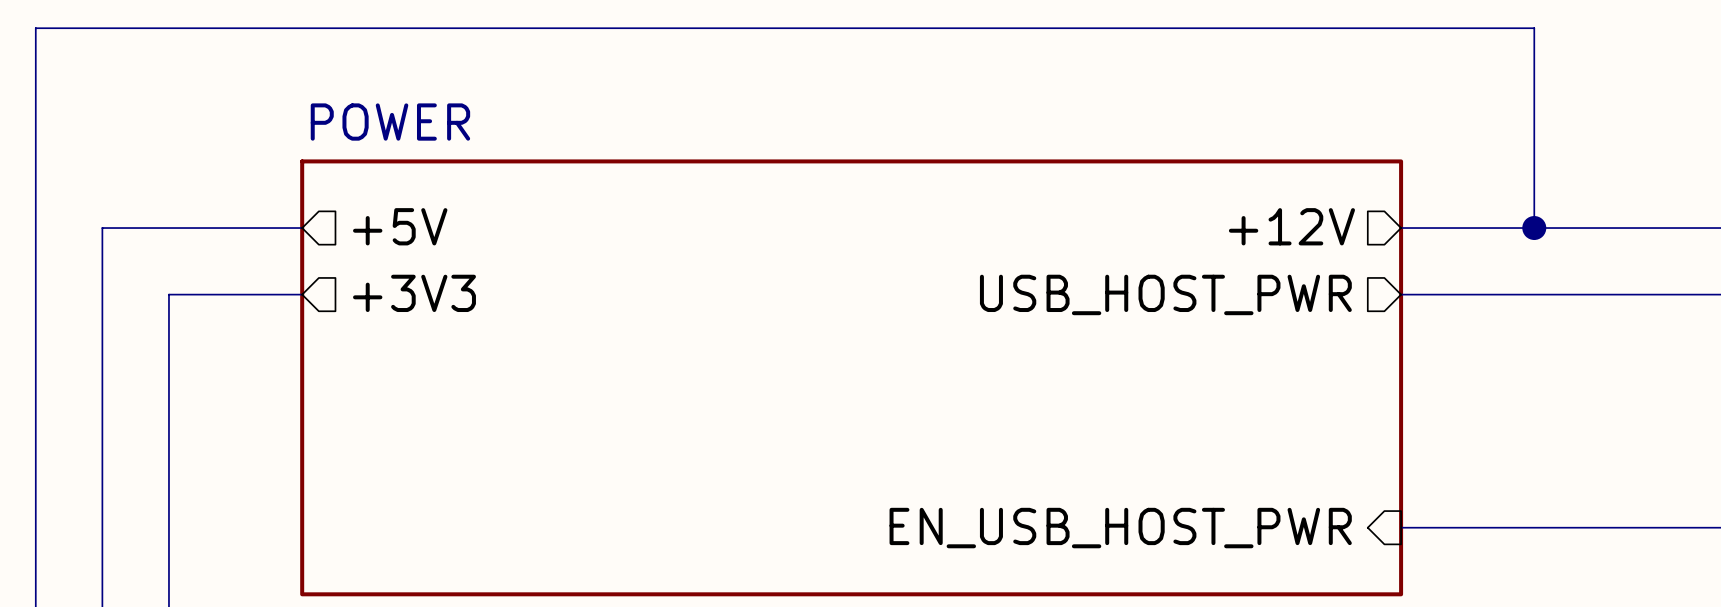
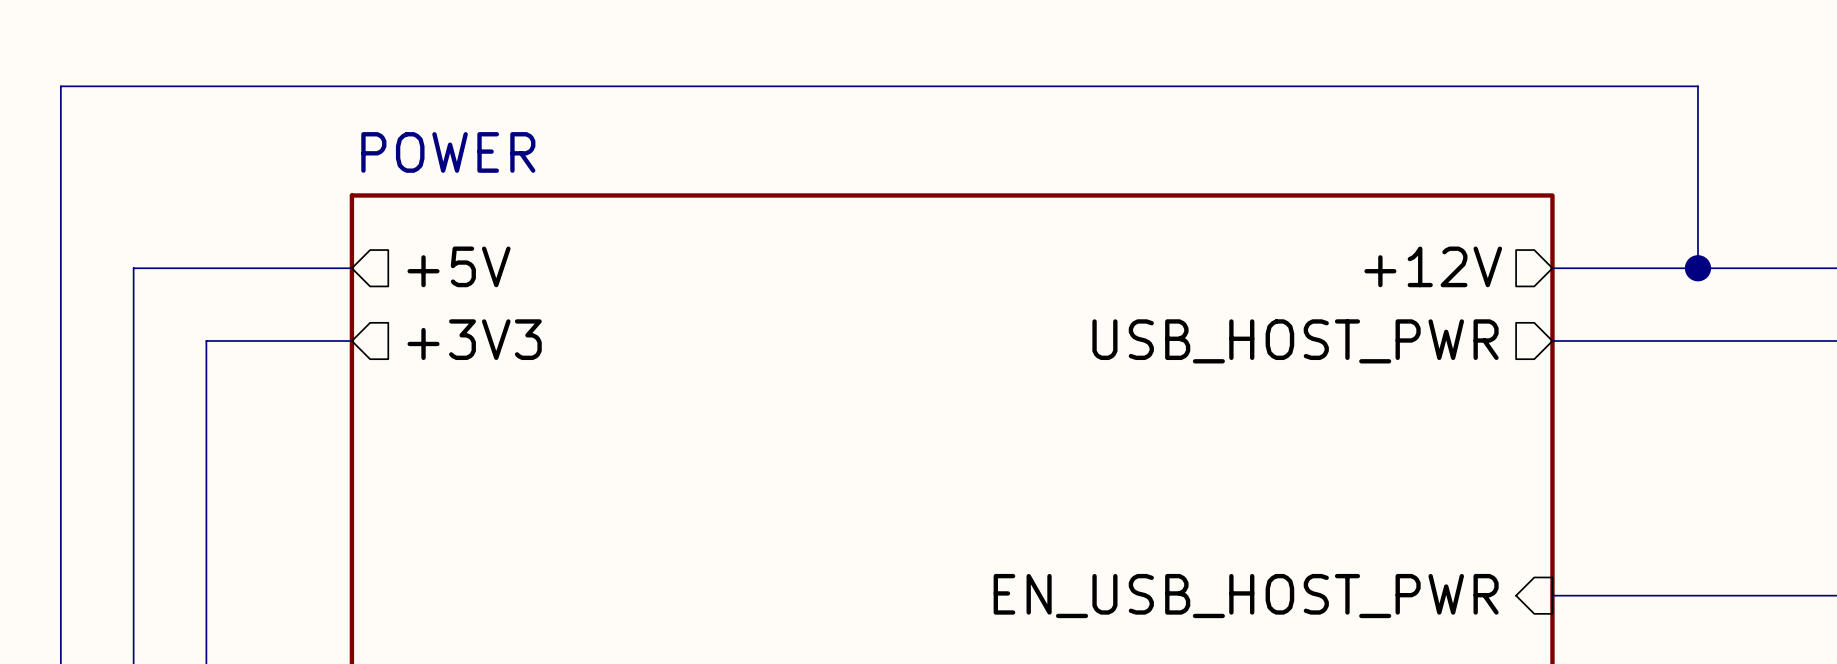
wire: (35, 61) (35, 28) (1534, 28) (1534, 61) -> (60, 86) (1697, 86)

